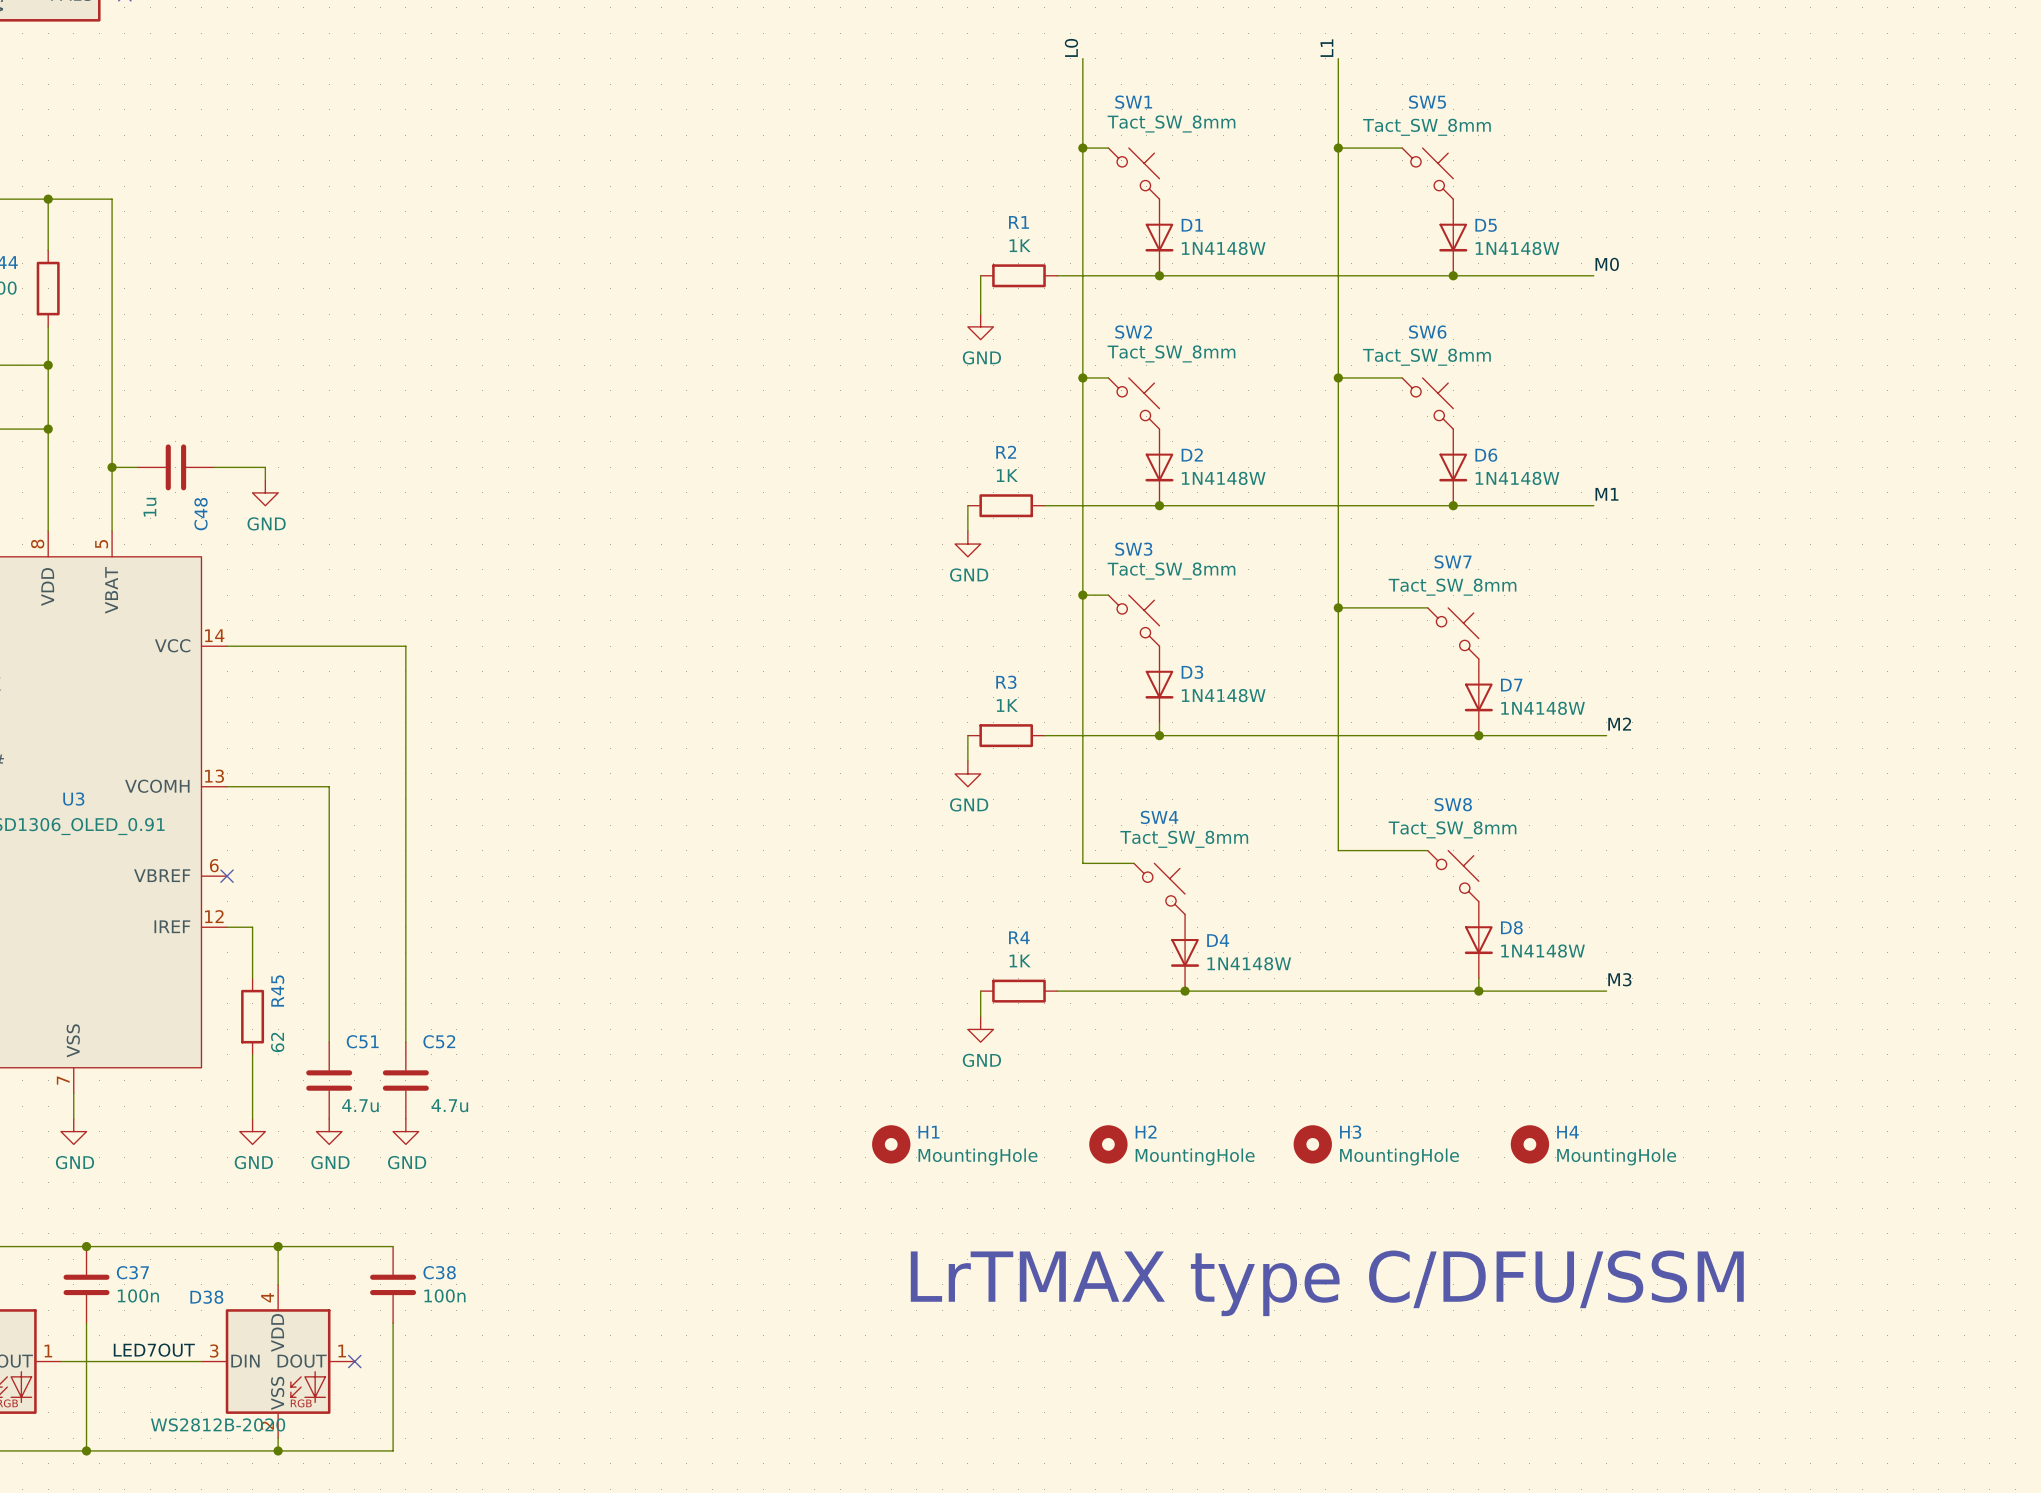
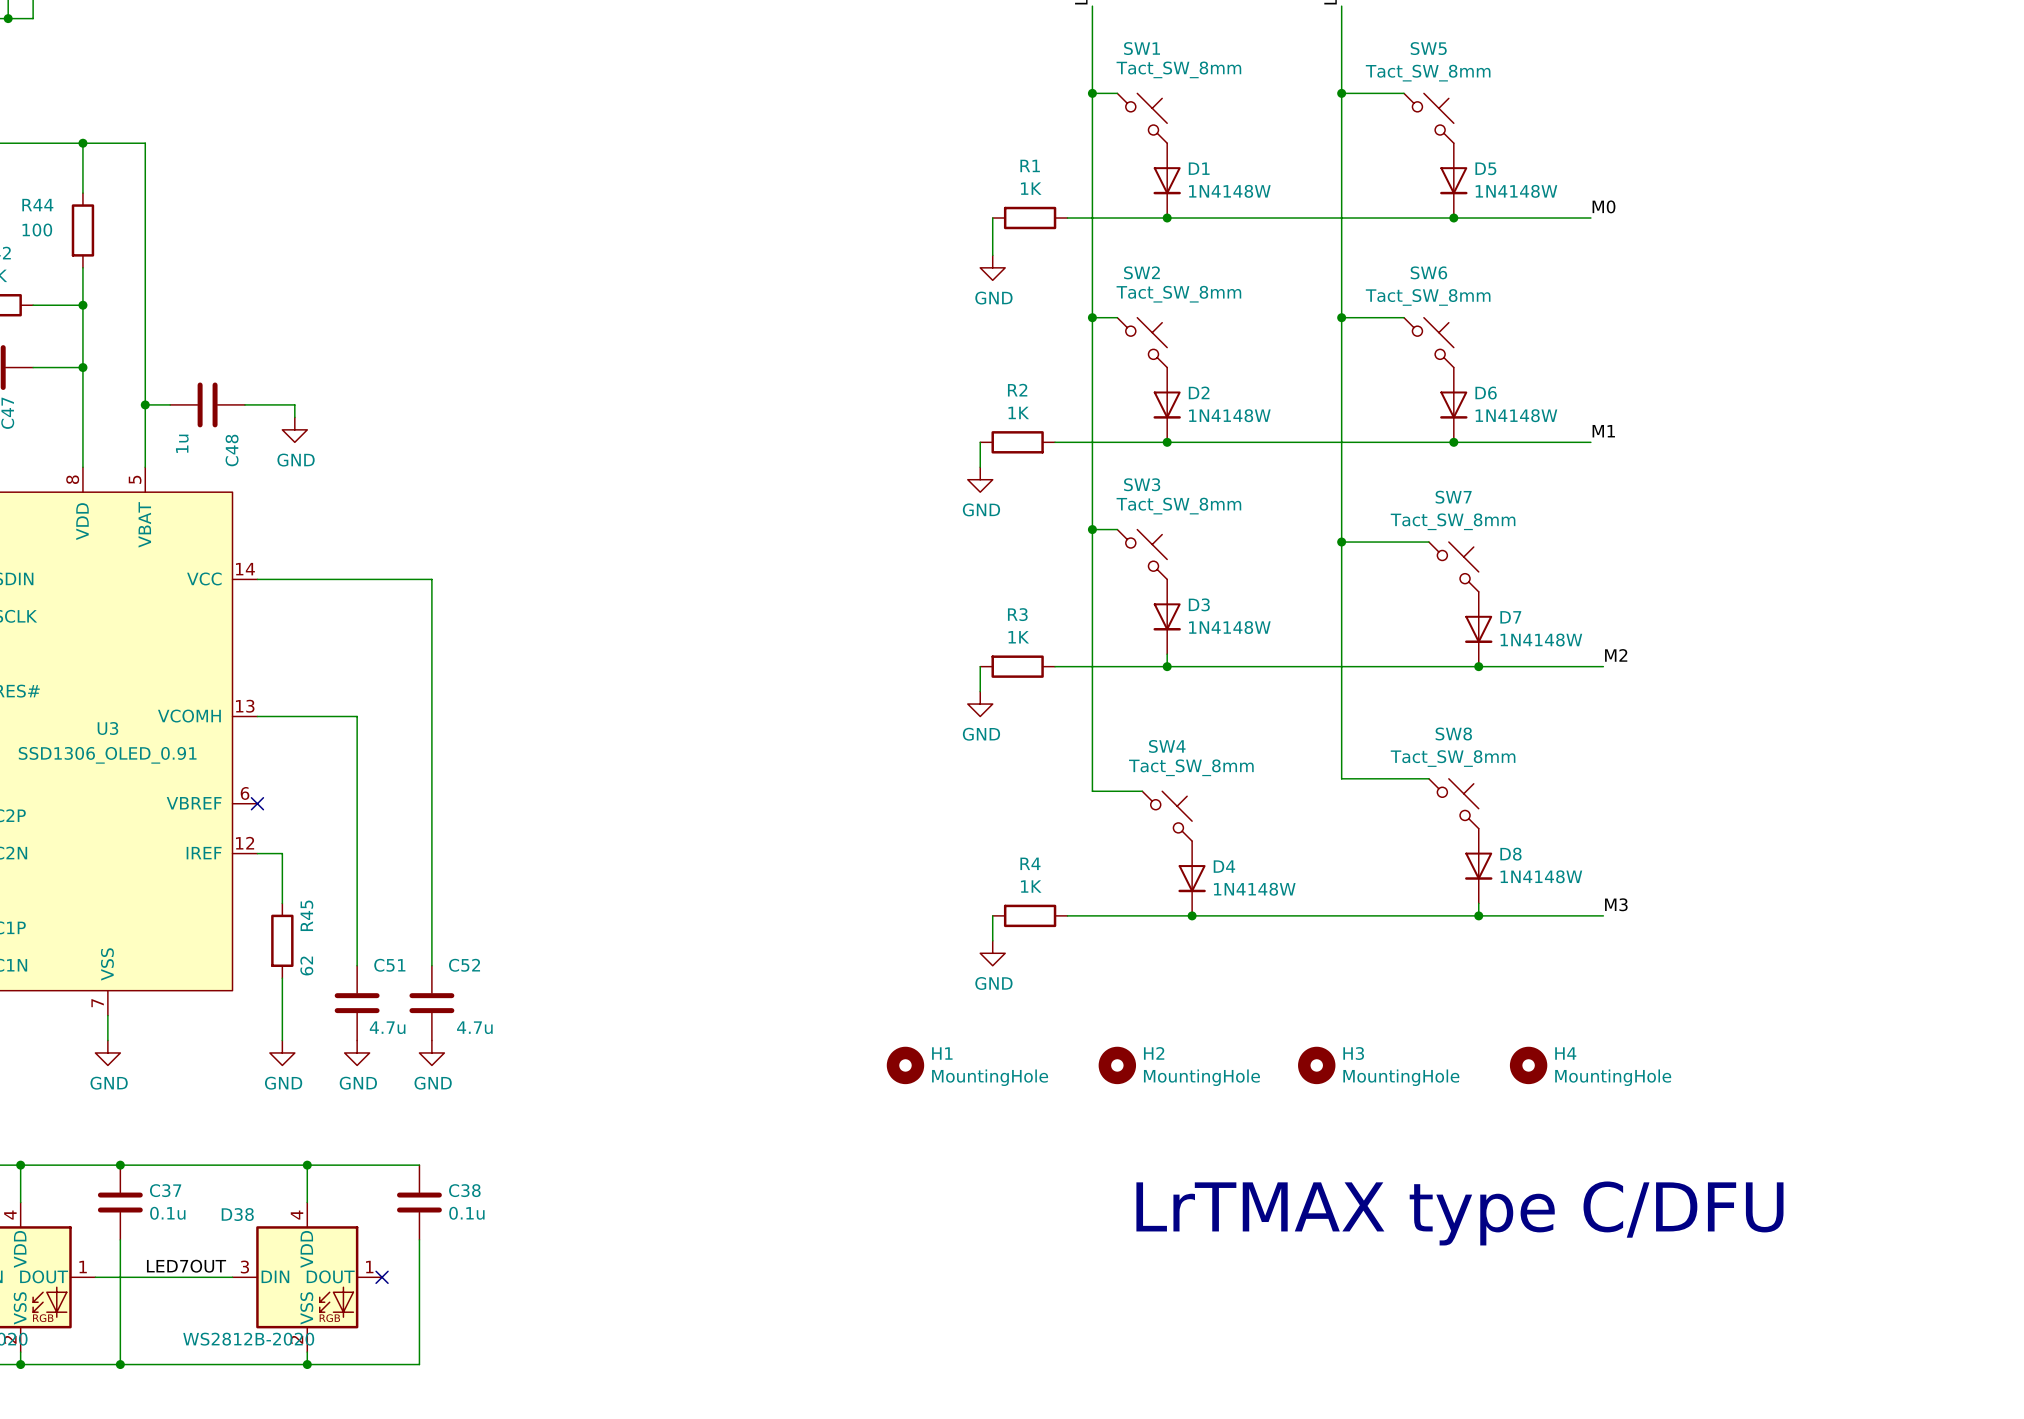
text: LrTMAX type C/DFU/SSM (1327, 1283) -> LrTMAX type C/DFU (1459, 1213)
C37 value: 100n (138, 1295) -> 0.1u (167, 1213)
C38 value: 100n (444, 1295) -> 0.1u (466, 1213)

